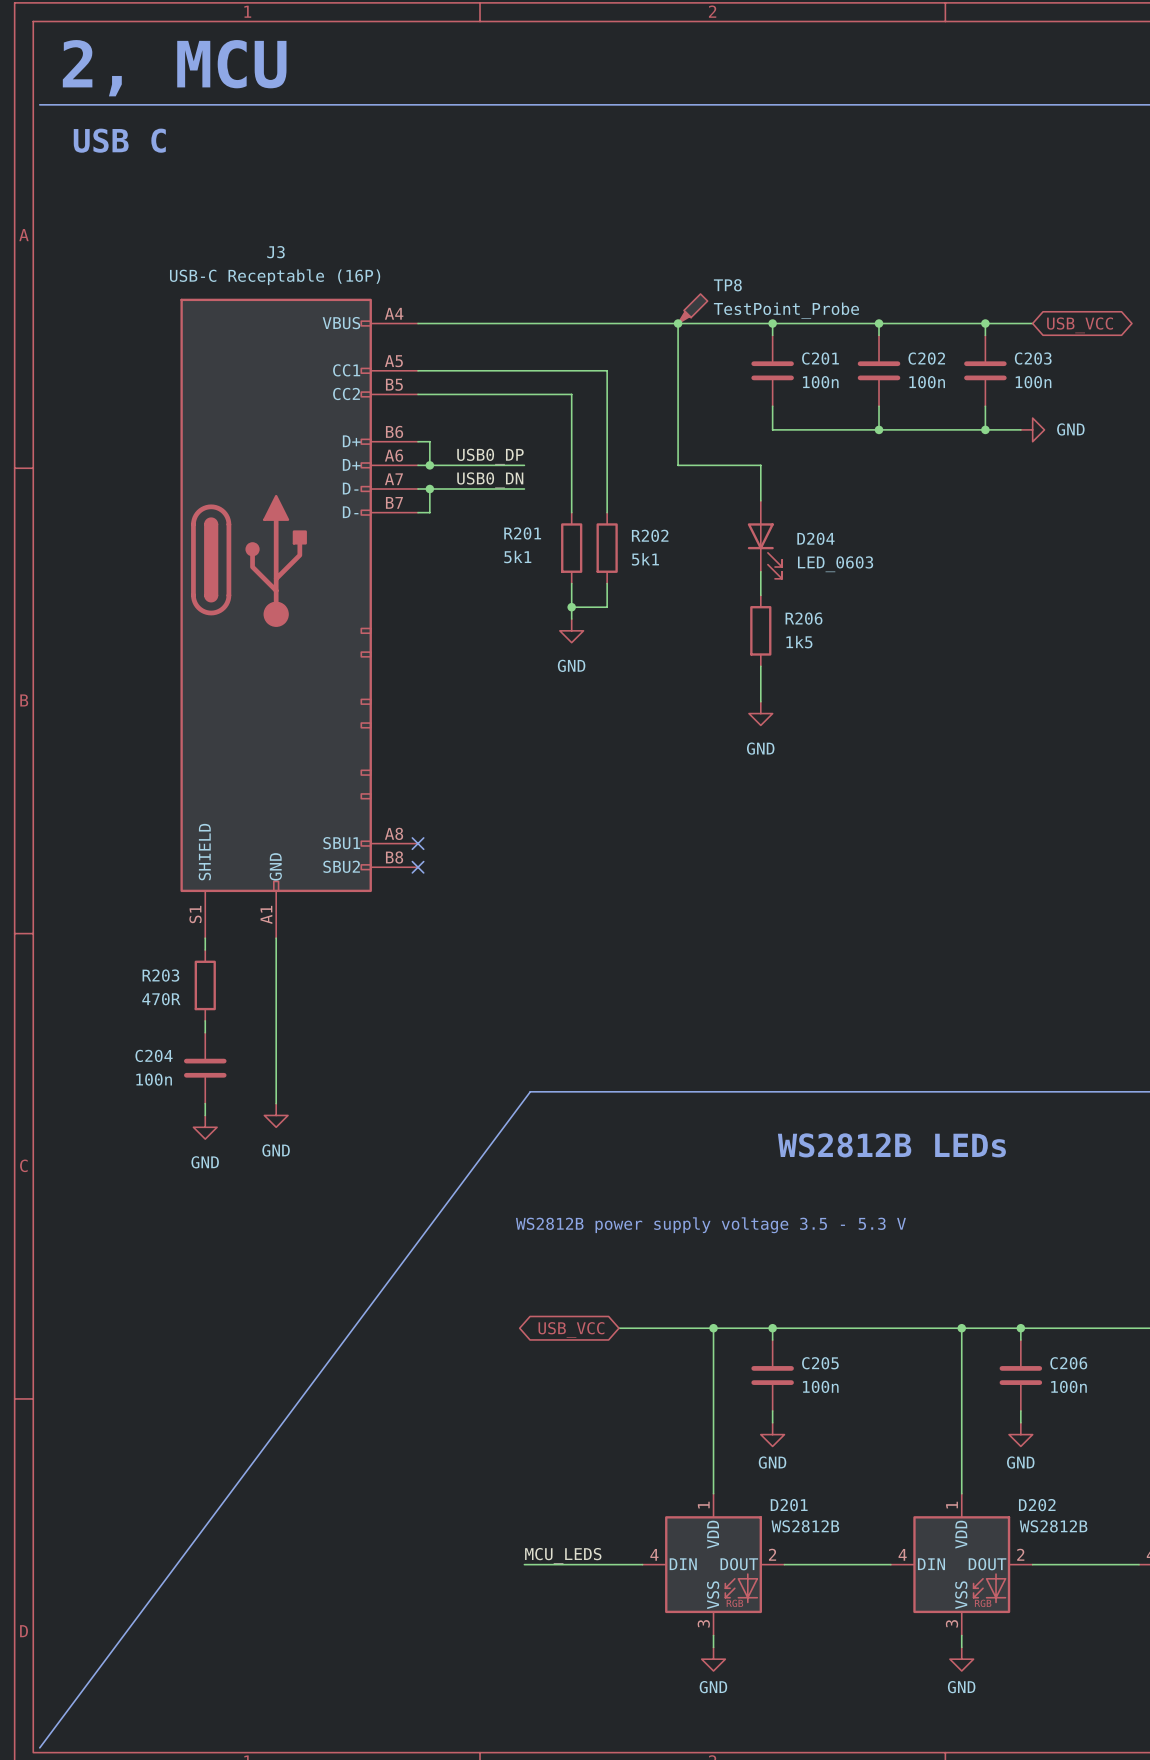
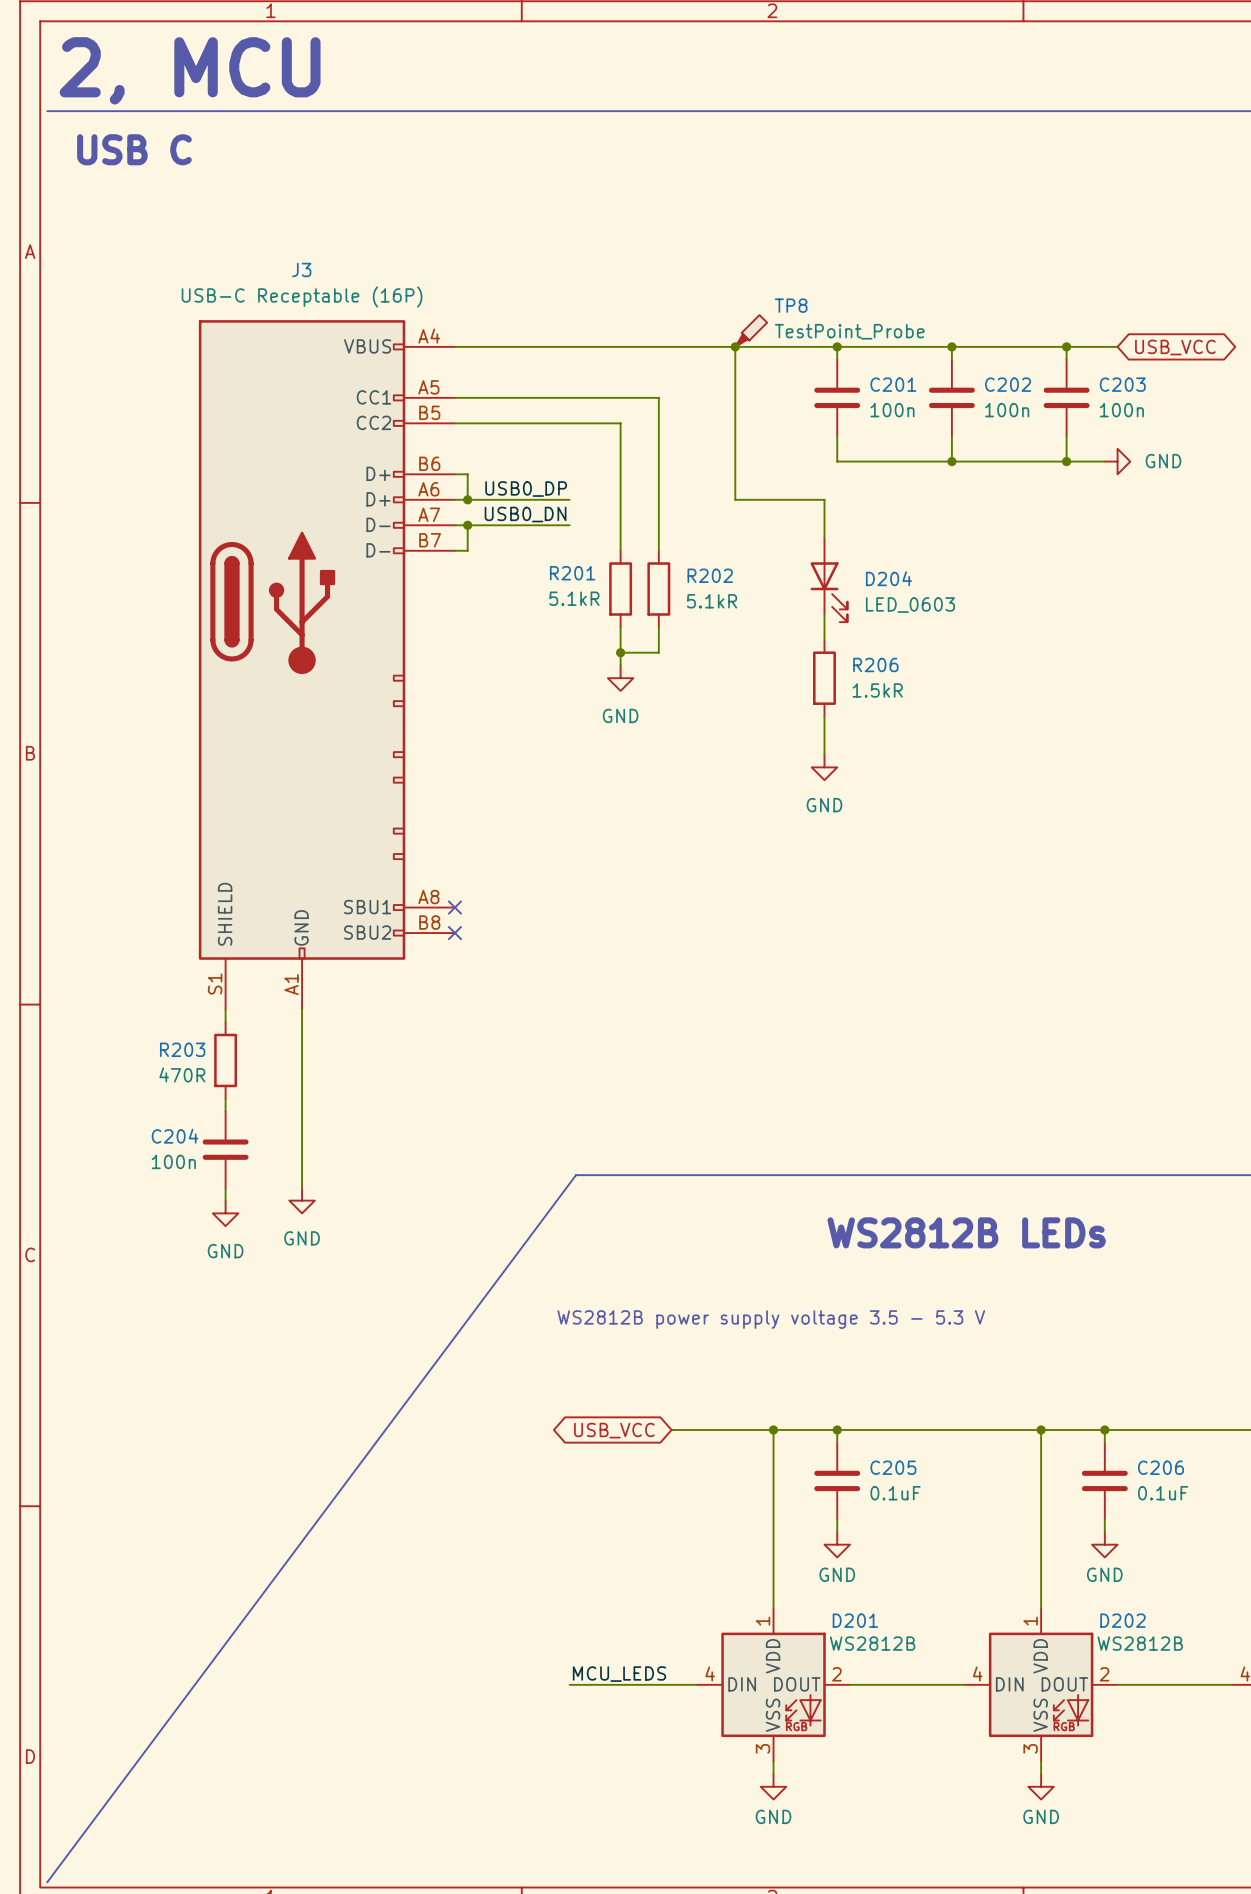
R201 value: 5k1 (517, 556) -> 5.1kR (574, 598)
R202 value: 5k1 (645, 559) -> 5.1kR (712, 601)
R206 value: 1k5 (799, 642) -> 1.5kR (877, 690)
C205 value: 100n (820, 1386) -> 0.1uF (895, 1493)
C206 value: 100n (1068, 1386) -> 0.1uF (1163, 1493)

